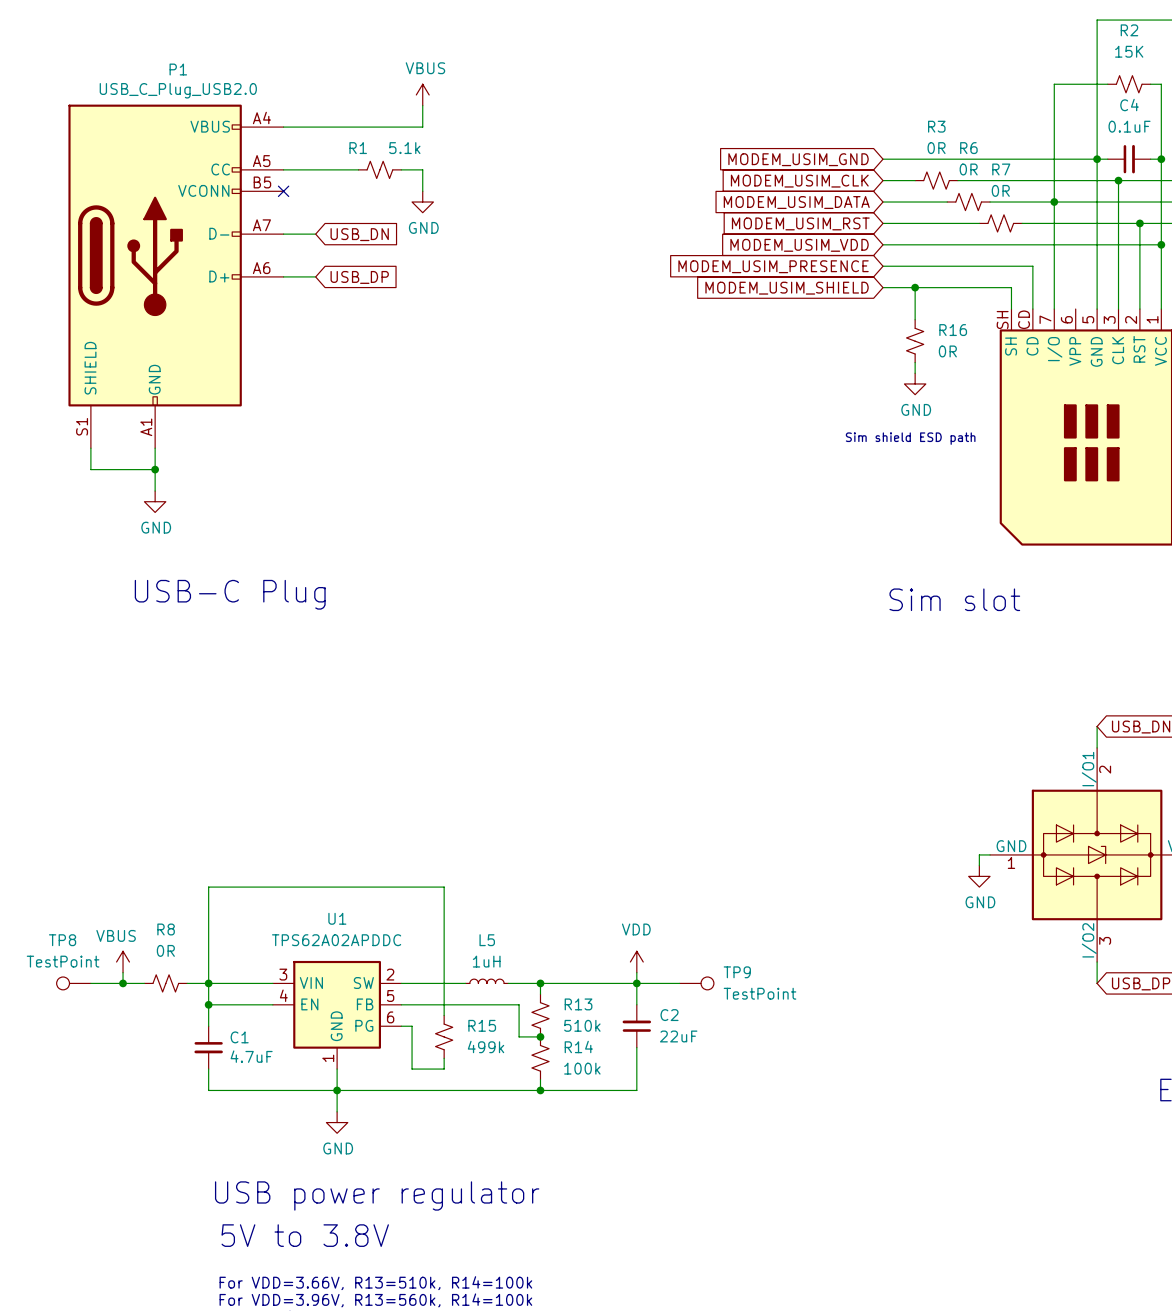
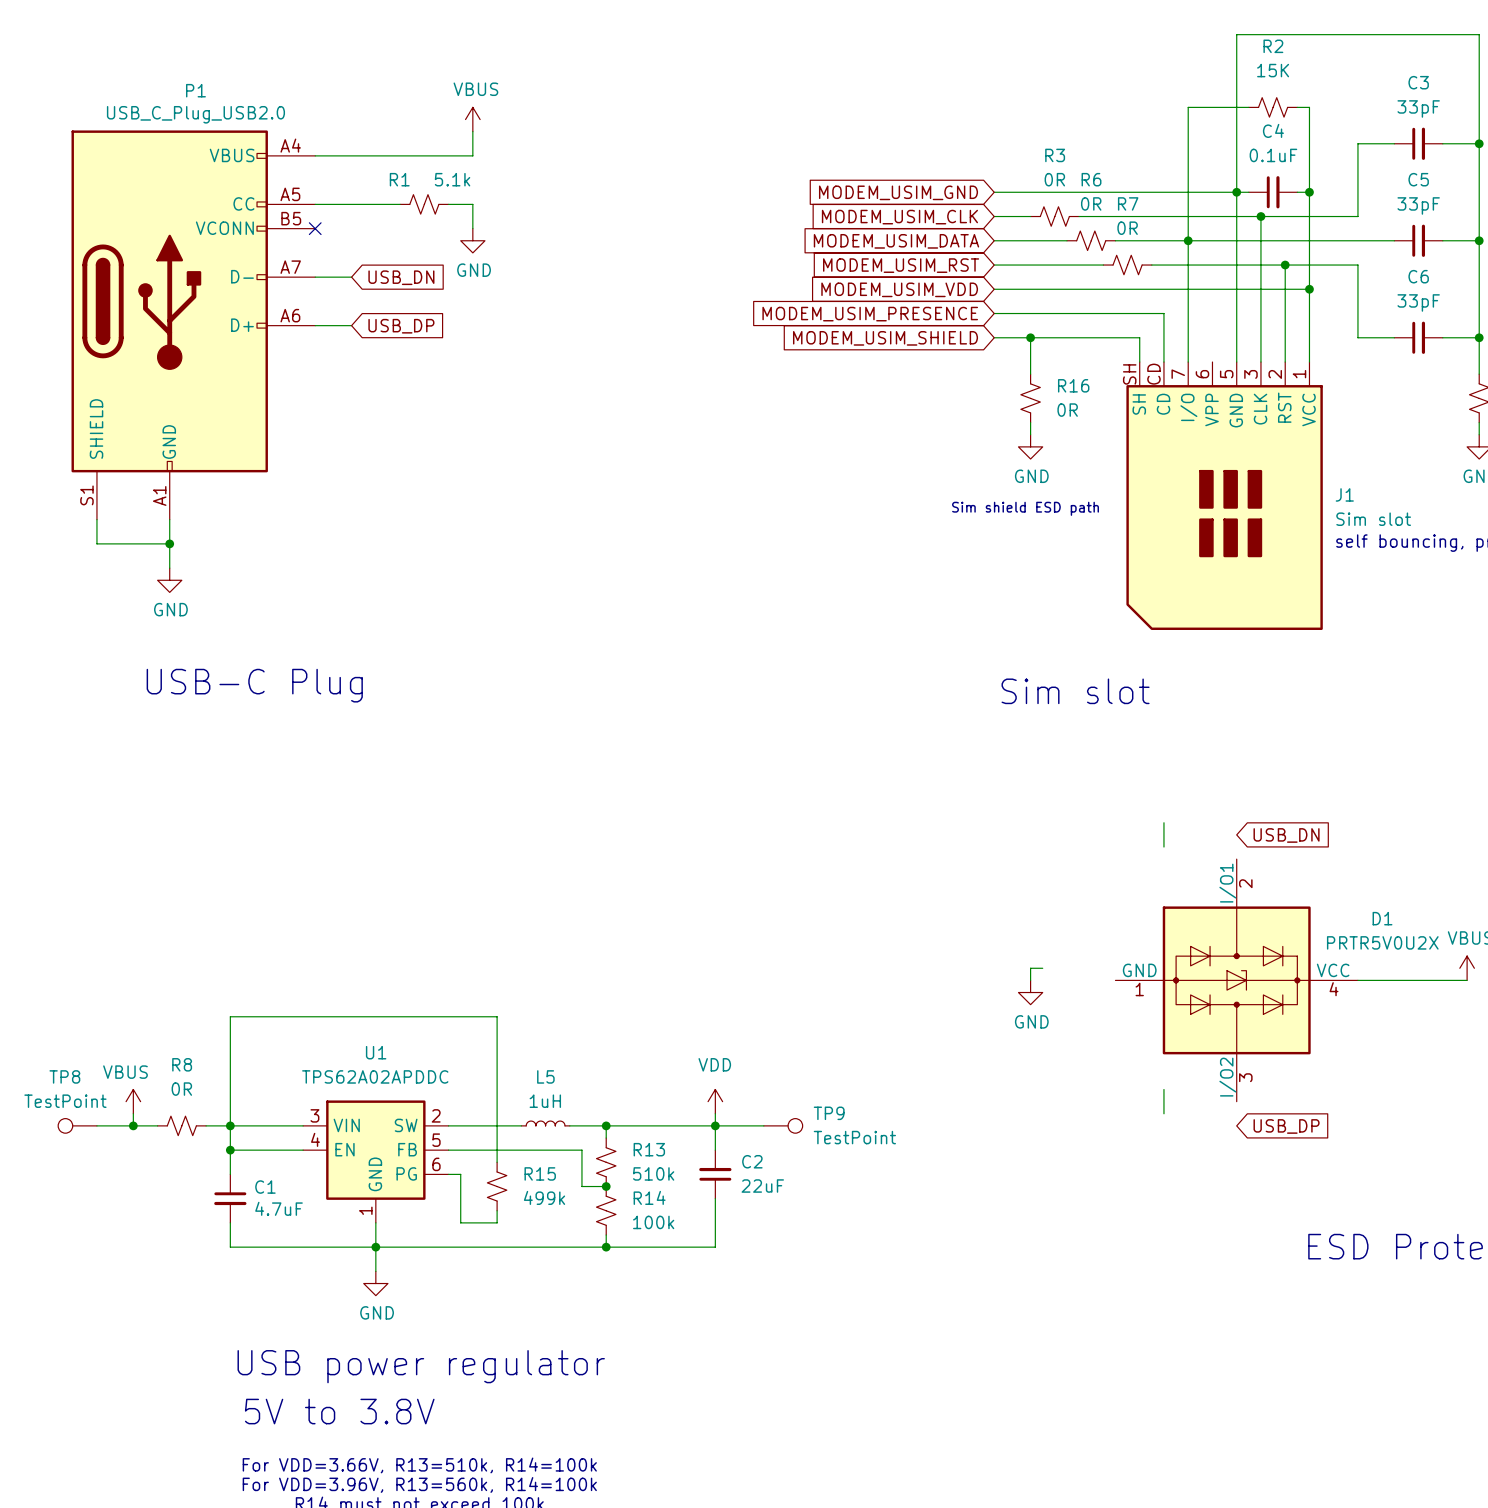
wire: (1097, 726) (1097, 747) -> (1163, 822) (1163, 847)
wire: (990, 854) (979, 854) (979, 865) -> (1042, 968) (1030, 968) (1030, 980)
power symbol position: GND (979, 876) -> GND (1030, 992)
wire: (1097, 962) (1097, 983) -> (1163, 1089) (1163, 1113)

